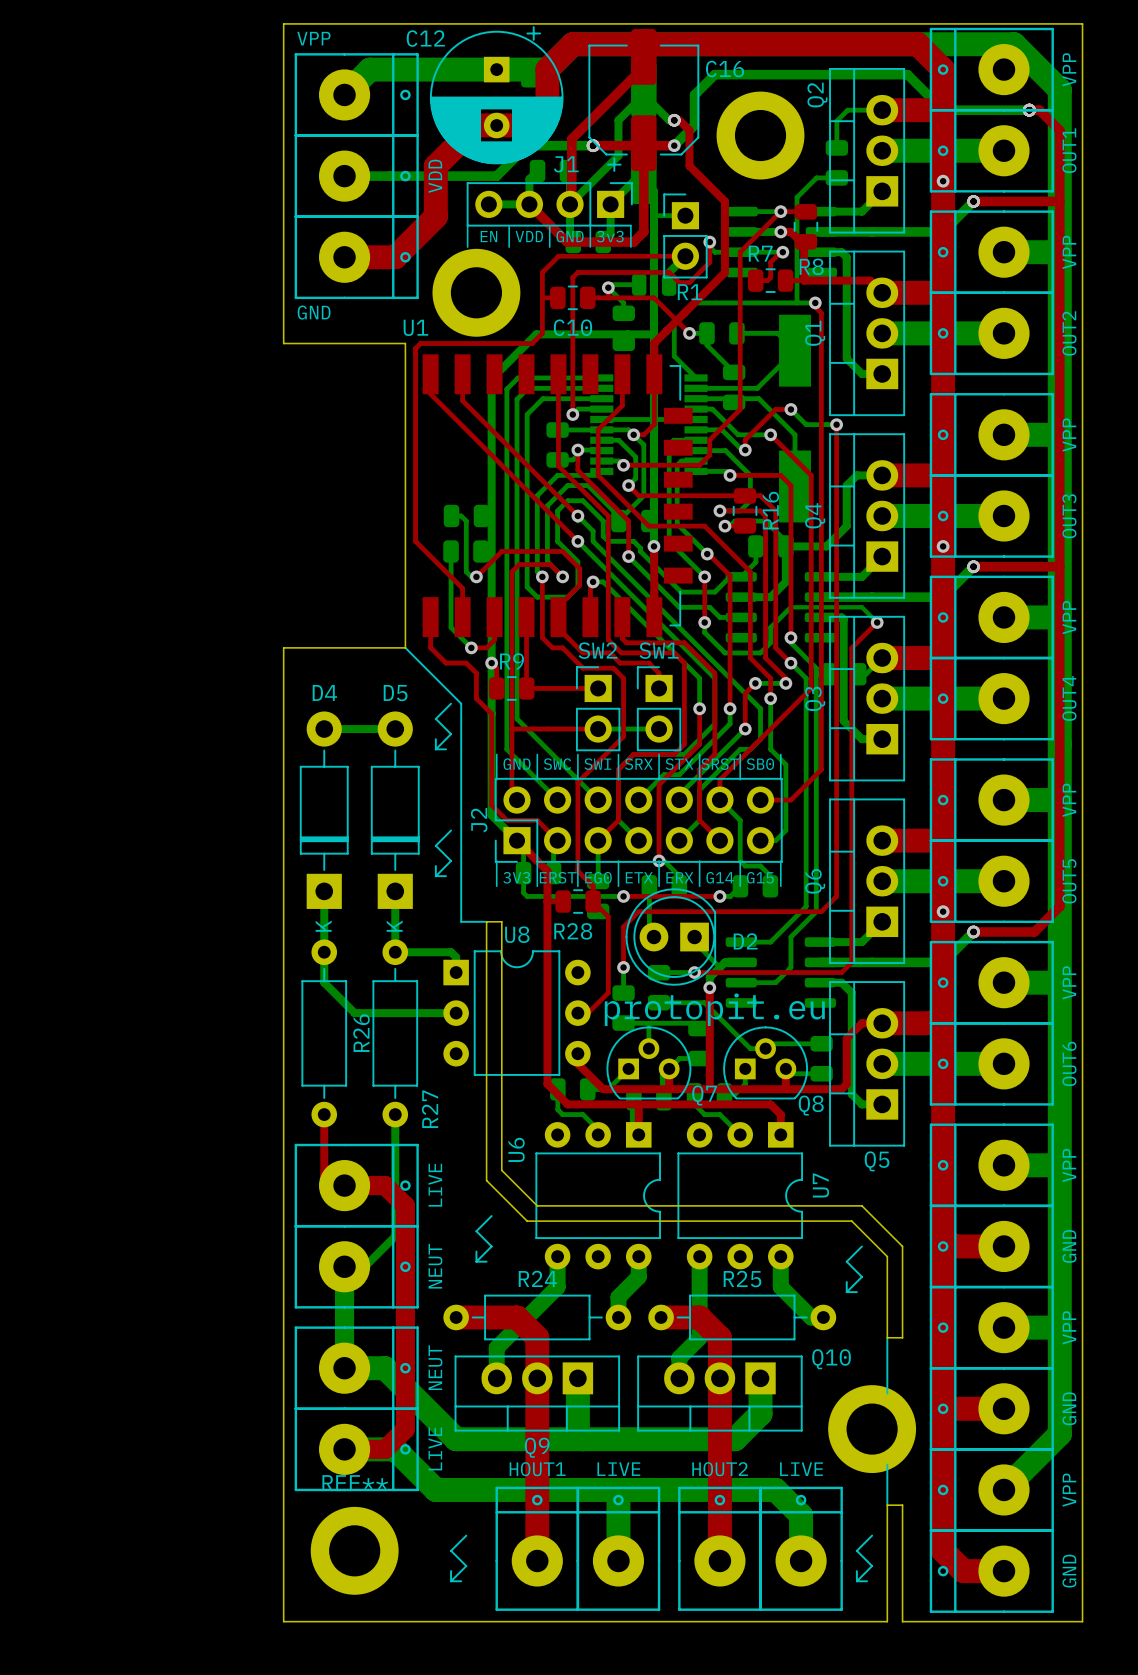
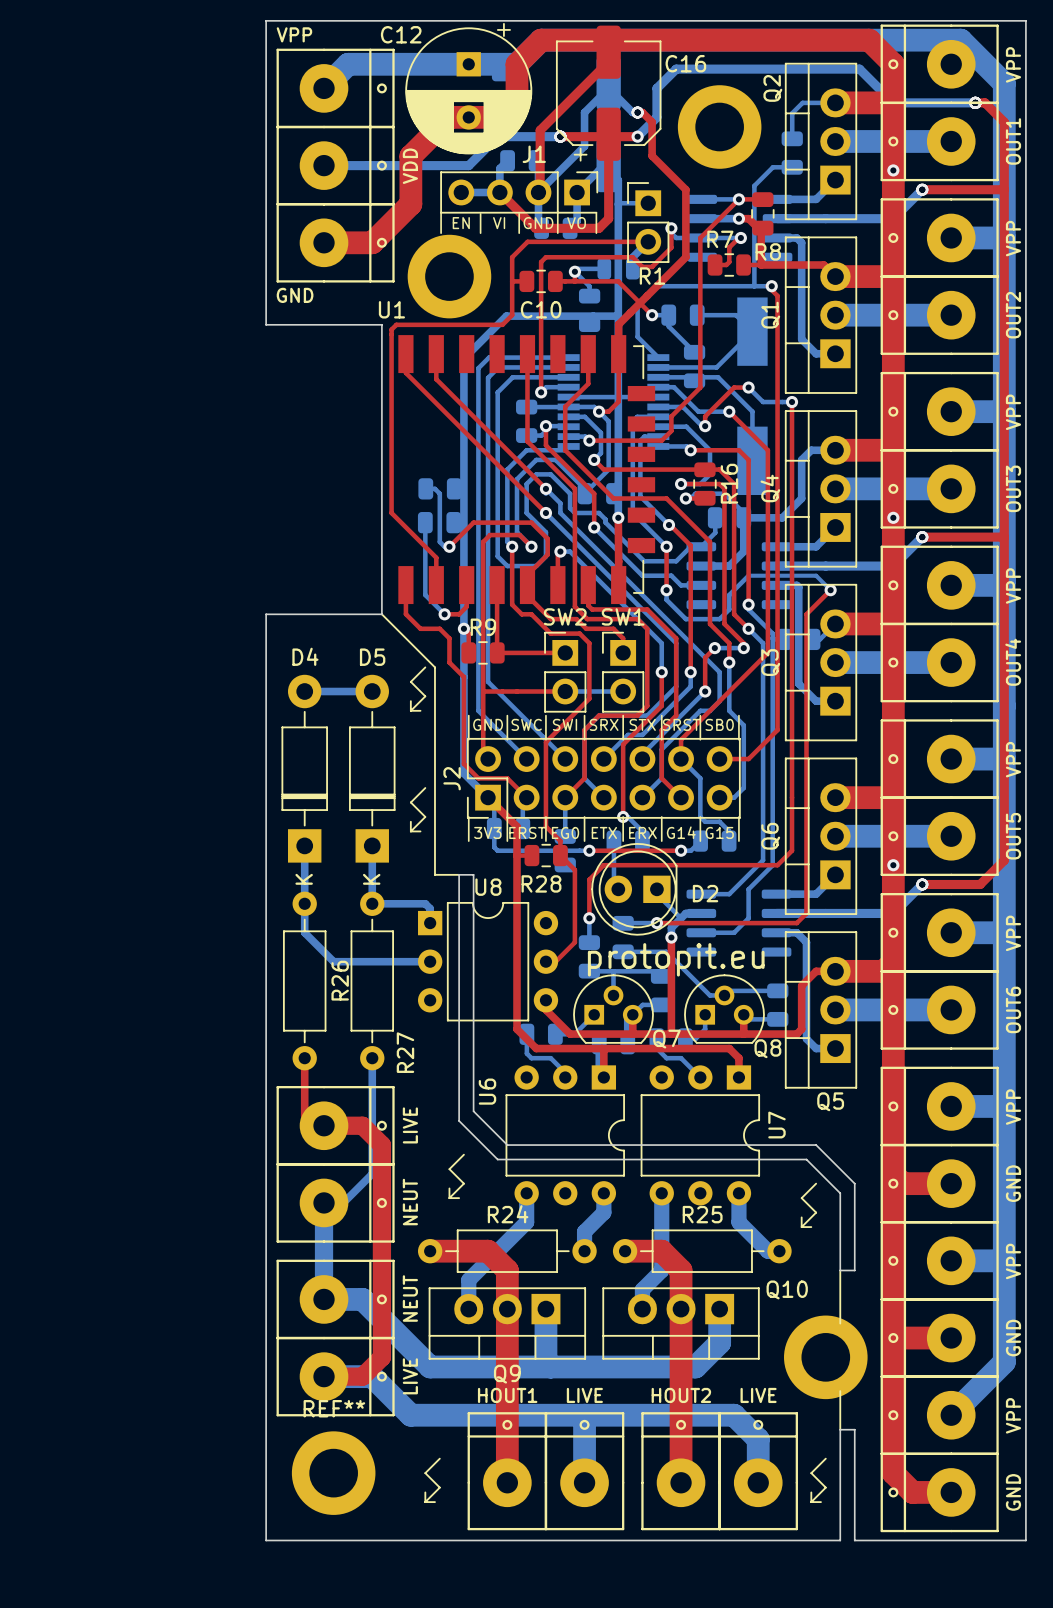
text: VDD (529, 236) -> VI (499, 223)
text: 3v3 (610, 236) -> VO (576, 223)

